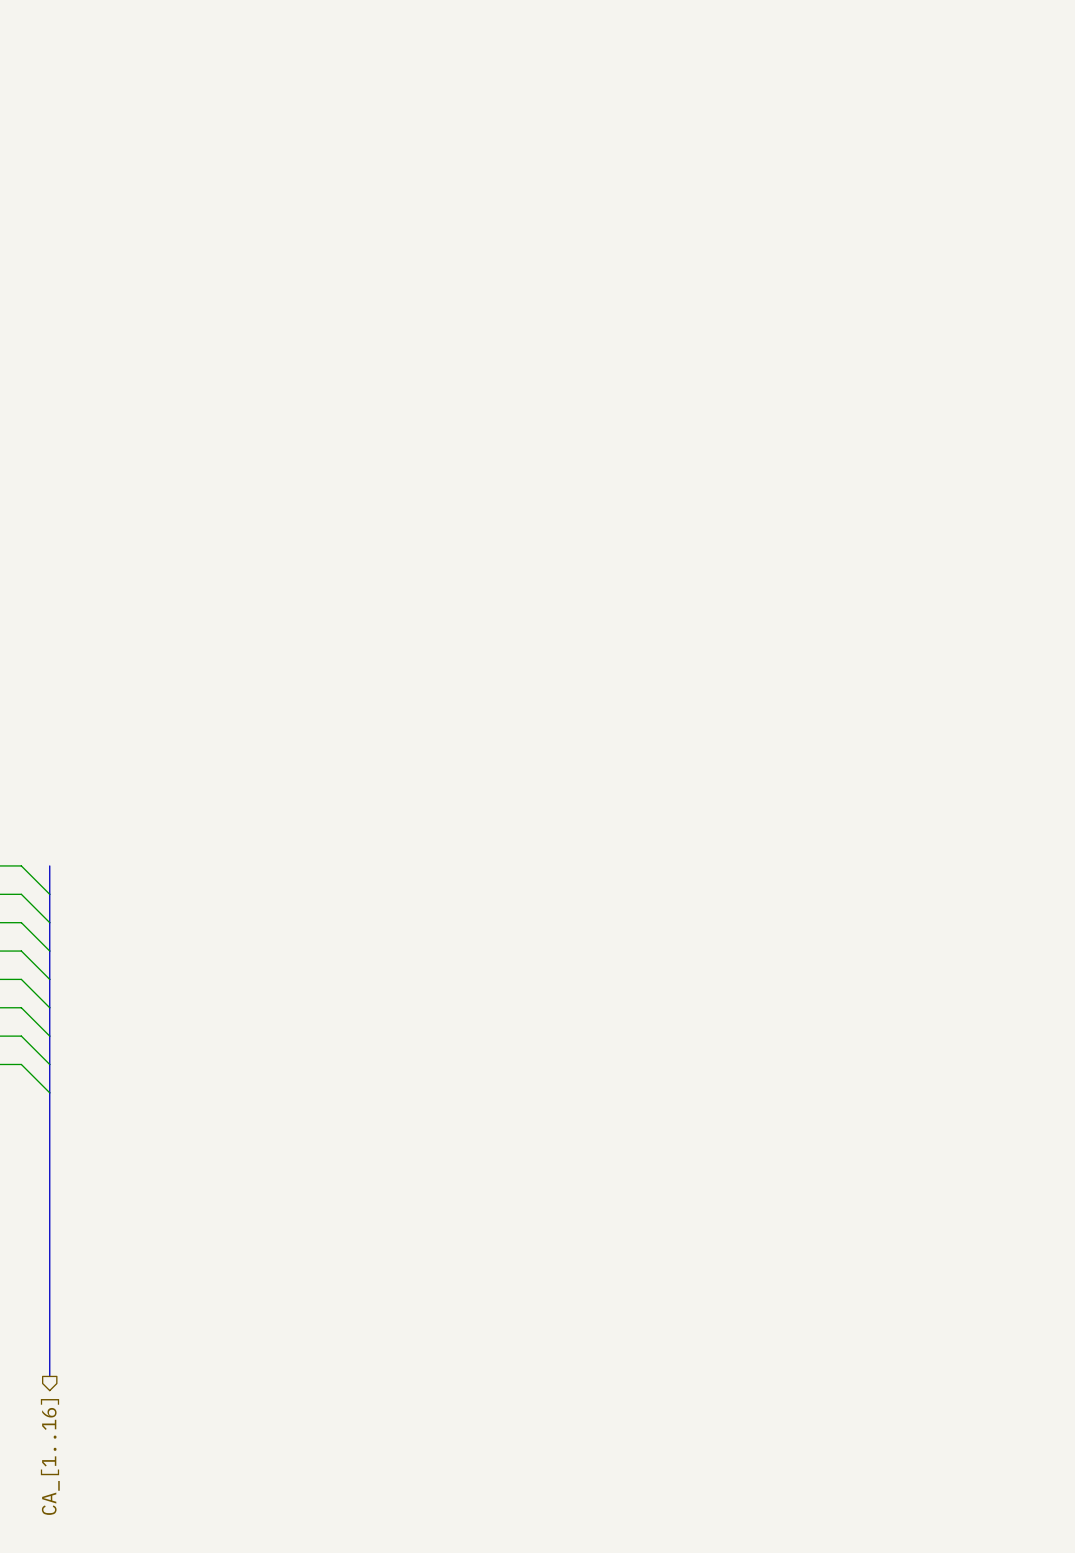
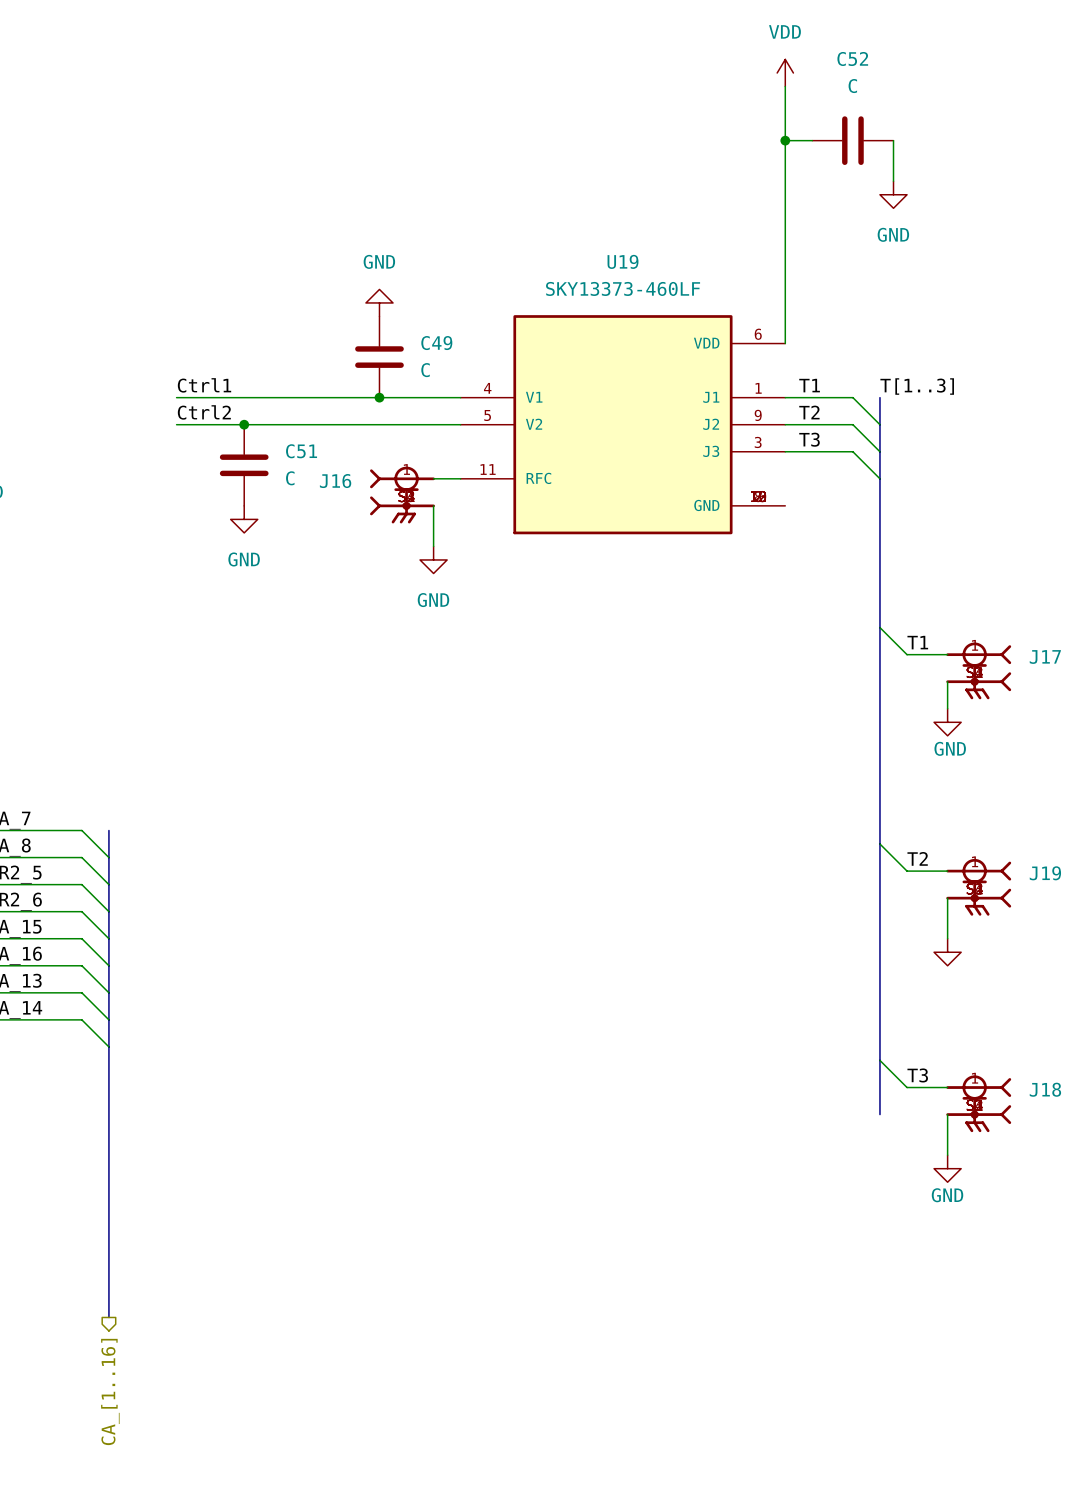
power symbol: none -> VDD (785, 73)
wire: none -> (785, 86) (785, 343)
wire: none -> (785, 140) (812, 140)
junction: none -> (785, 140)
C52: none -> C (852, 140)
wire: none -> (893, 140) (893, 181)
power symbol: none -> GND (893, 194)
power symbol: none -> GND (379, 302)
C49: none -> C (379, 357)
label: none -> Ctrl1 (204, 385)
label: none -> T1 (809, 385)
label: none -> T[1..3] (917, 386)
wire: none -> (176, 397) (460, 397)
junction: none -> (379, 397)
wire: none -> (785, 397) (852, 397) (879, 424)
bus: none -> (879, 397) (879, 1114)
label: none -> Ctrl2 (204, 412)
label: none -> T2 (809, 412)
wire: none -> (176, 424) (460, 424)
junction: none -> (244, 424)
U19: none -> SKY13373-460LF (622, 424)
wire: none -> (785, 424) (852, 424) (879, 451)
label: none -> T3 (809, 439)
wire: none -> (785, 451) (852, 451) (879, 478)
C51: none -> C (244, 465)
wire: none -> (433, 478) (460, 478)
J16: none -> (402, 495)
wire: none -> (433, 505) (433, 546)
power symbol: none -> GND (244, 519)
power symbol: none -> GND (433, 559)
wire: none -> (879, 627) (907, 654) (947, 654)
label: none -> T1 (917, 642)
J17: none -> (978, 670)
wire: none -> (947, 681) (947, 708)
power symbol: none -> GND (947, 722)
wire: none -> (879, 844) (907, 871) (947, 871)
label: none -> T2 (917, 858)
J19: none -> (978, 887)
wire: none -> (947, 898) (947, 938)
power symbol: none -> (947, 952)
wire: none -> (879, 1060) (907, 1087) (947, 1087)
label: none -> T3 (917, 1075)
J18: none -> (978, 1103)
wire: none -> (947, 1114) (947, 1155)
power symbol: none -> GND (947, 1168)

